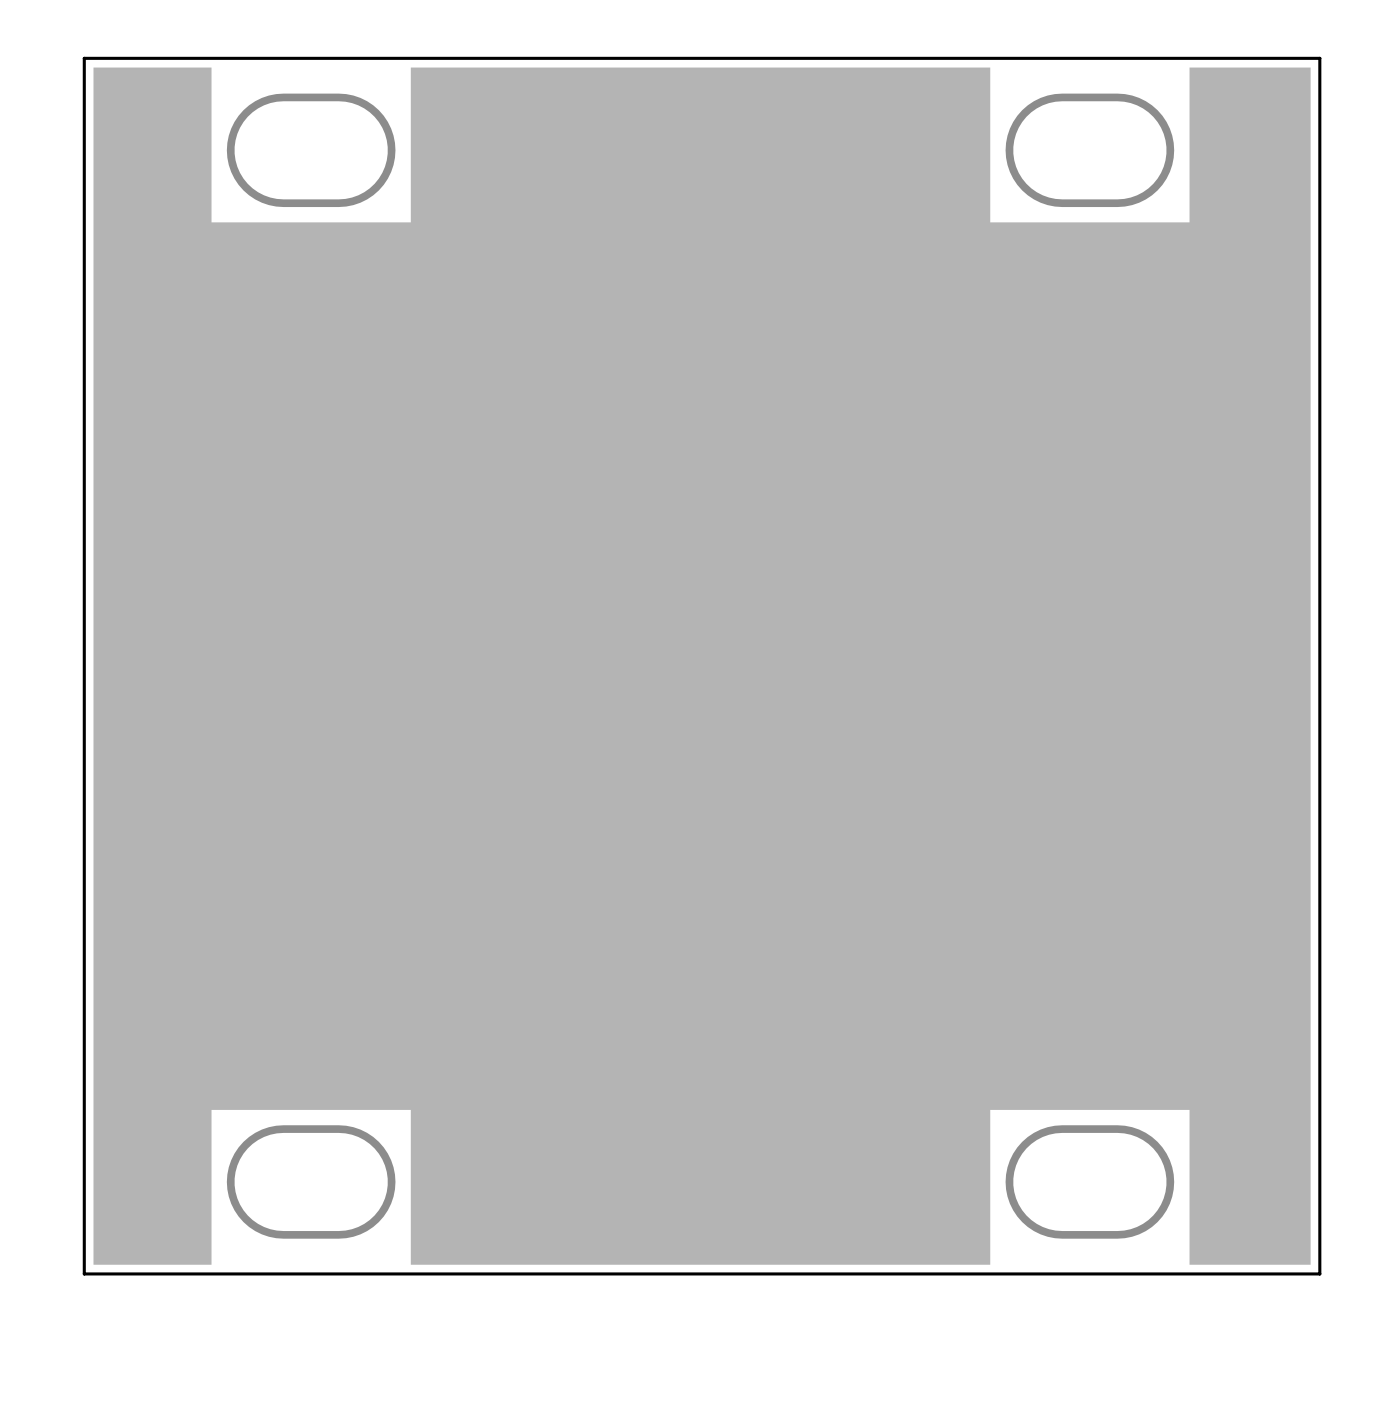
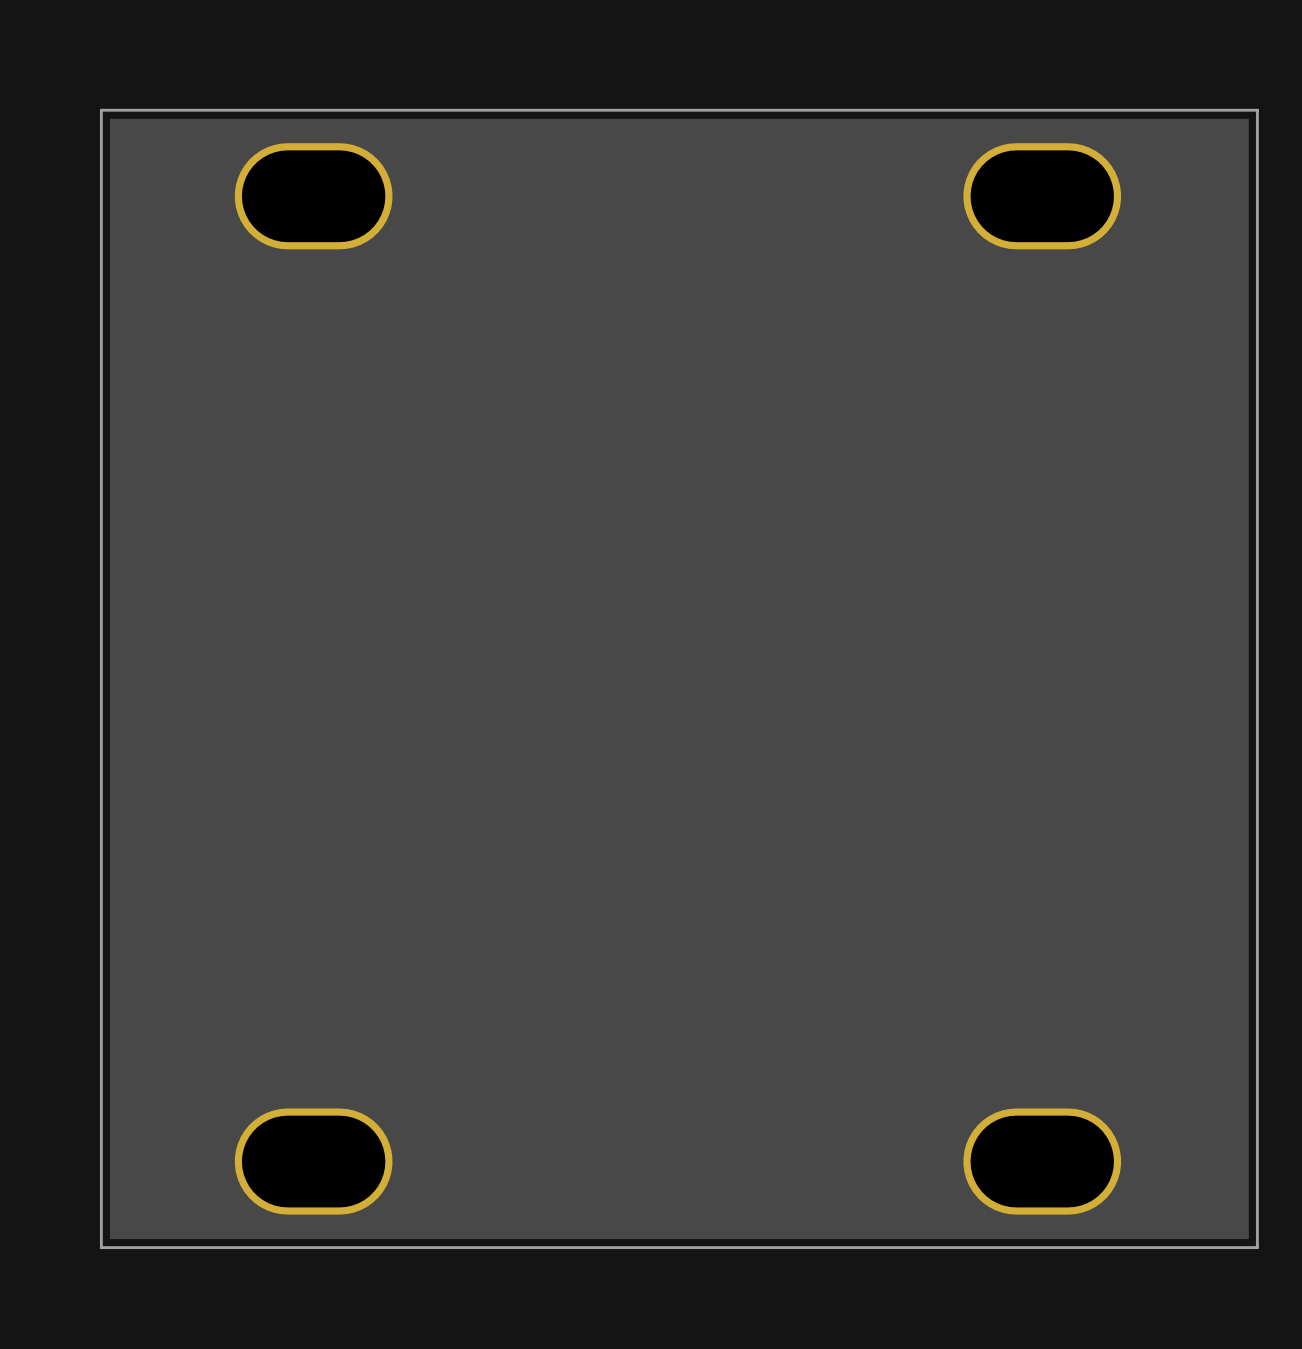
drawing: [93, 67, 212, 1265] -> none
drawing: [410, 67, 991, 223] -> none
drawing: [1189, 67, 1311, 1265] -> none
drawing shape: [211, 222, 1190, 1110] -> [109, 118, 1249, 1239]
drawing: [410, 1109, 991, 1265] -> none

